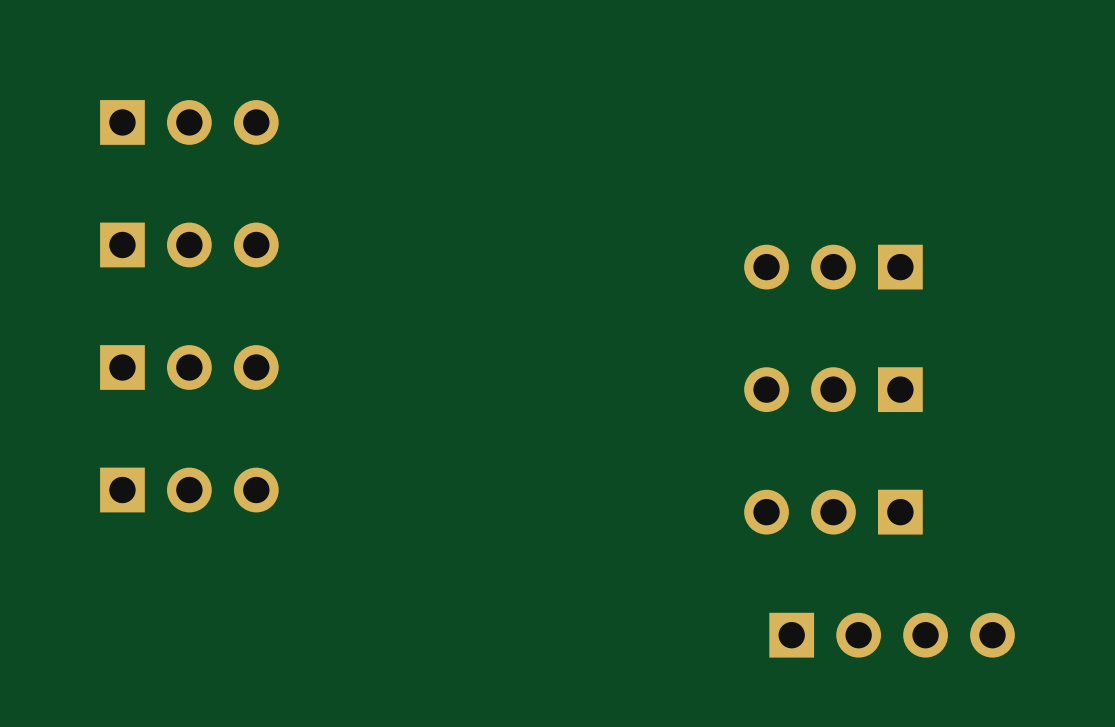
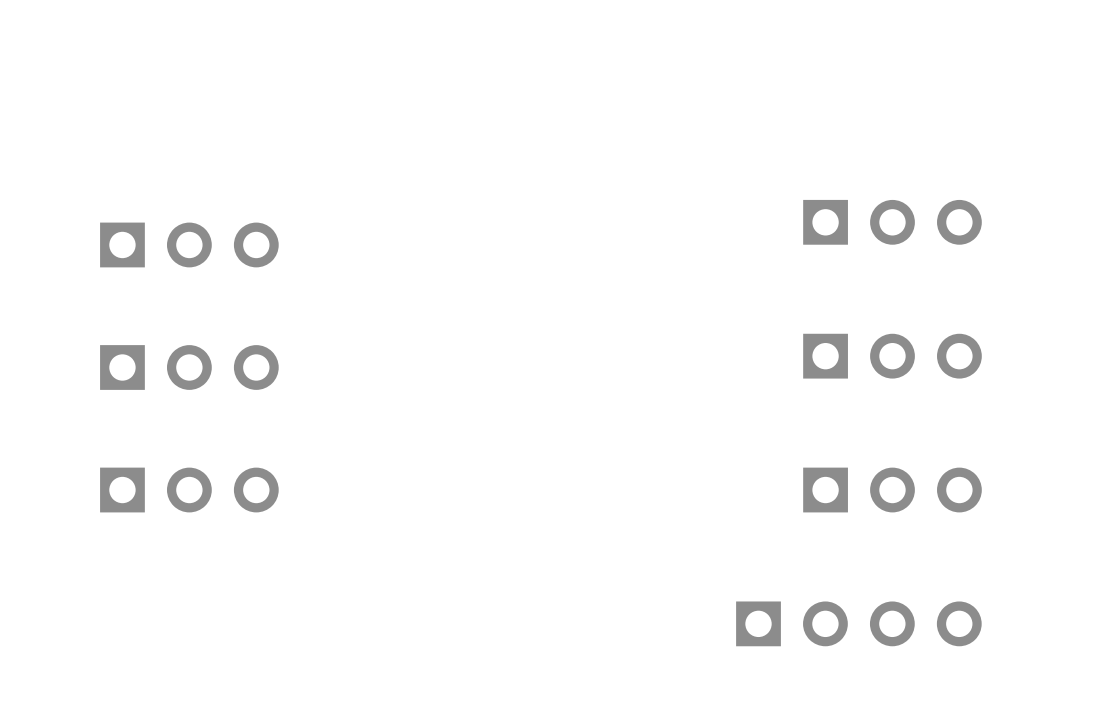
part: (189, 122) -> none
part: none -> (892, 222)
part: (833, 267) -> none
part: none -> (892, 356)
part: (833, 389) -> none
part: none -> (892, 490)
part: (833, 512) -> none
part position: (892, 635) -> (858, 623)

